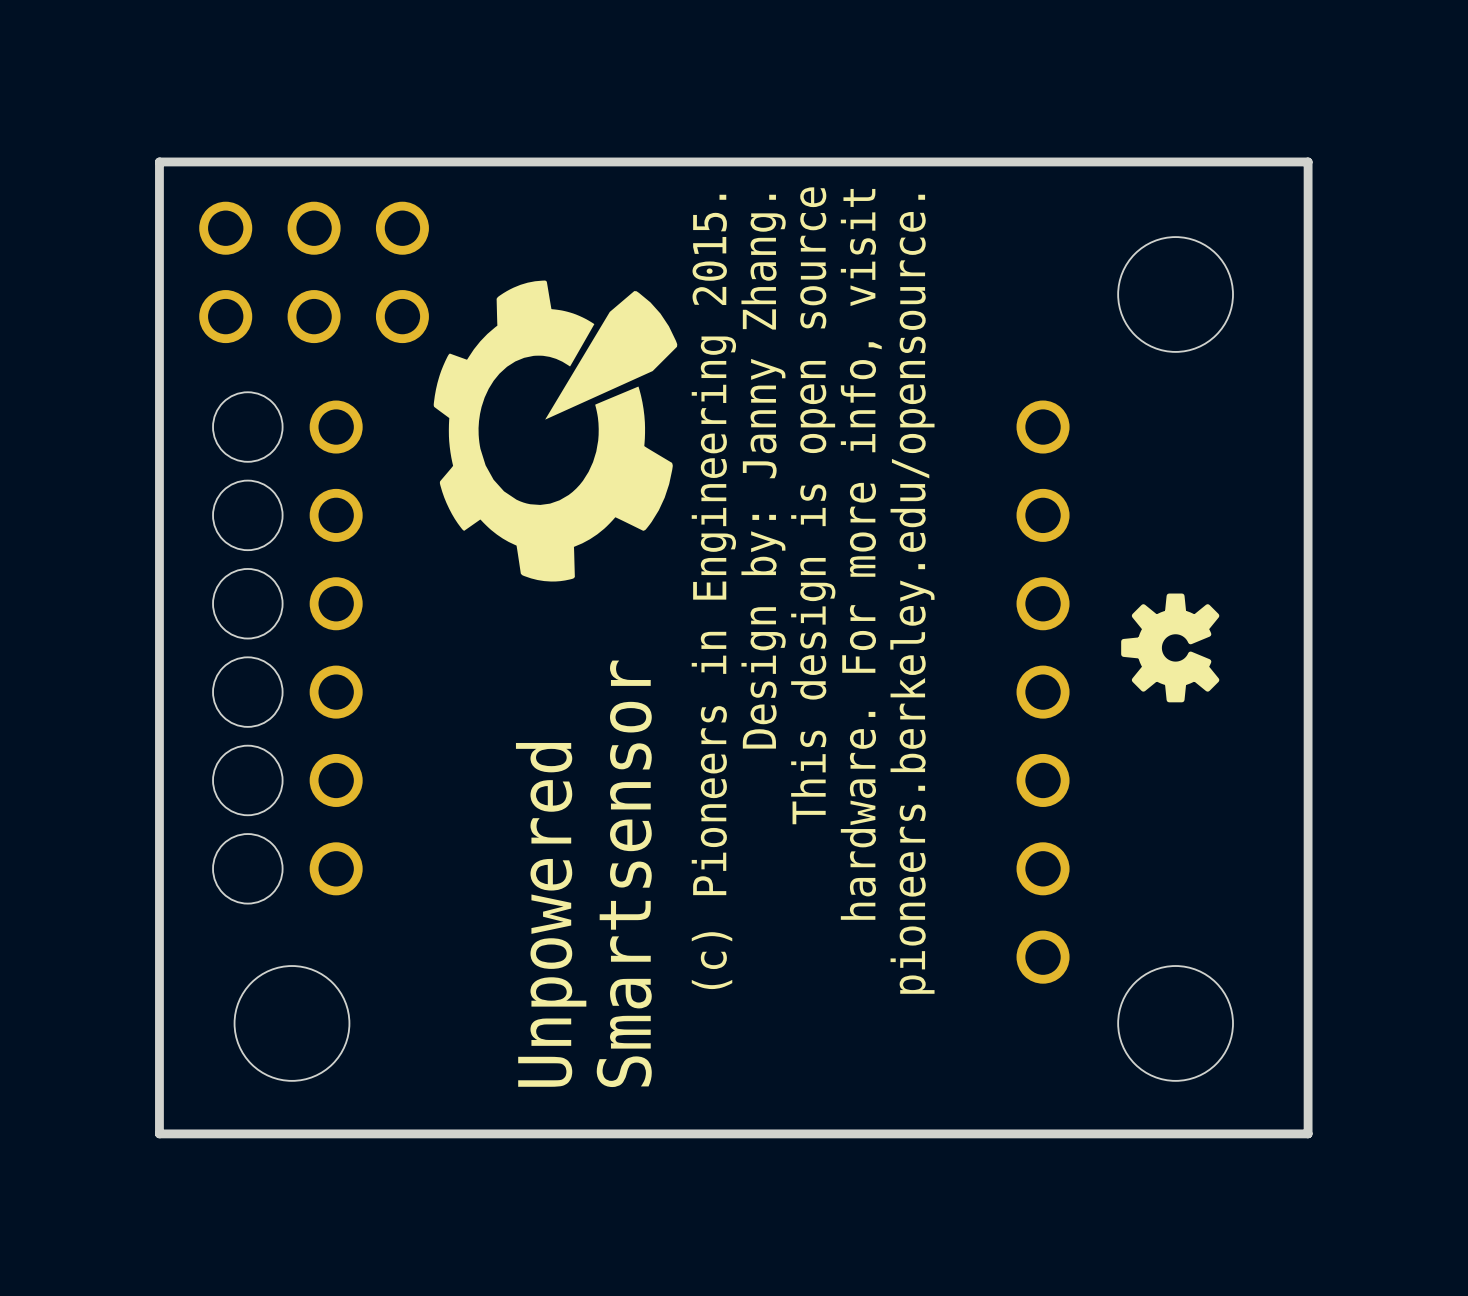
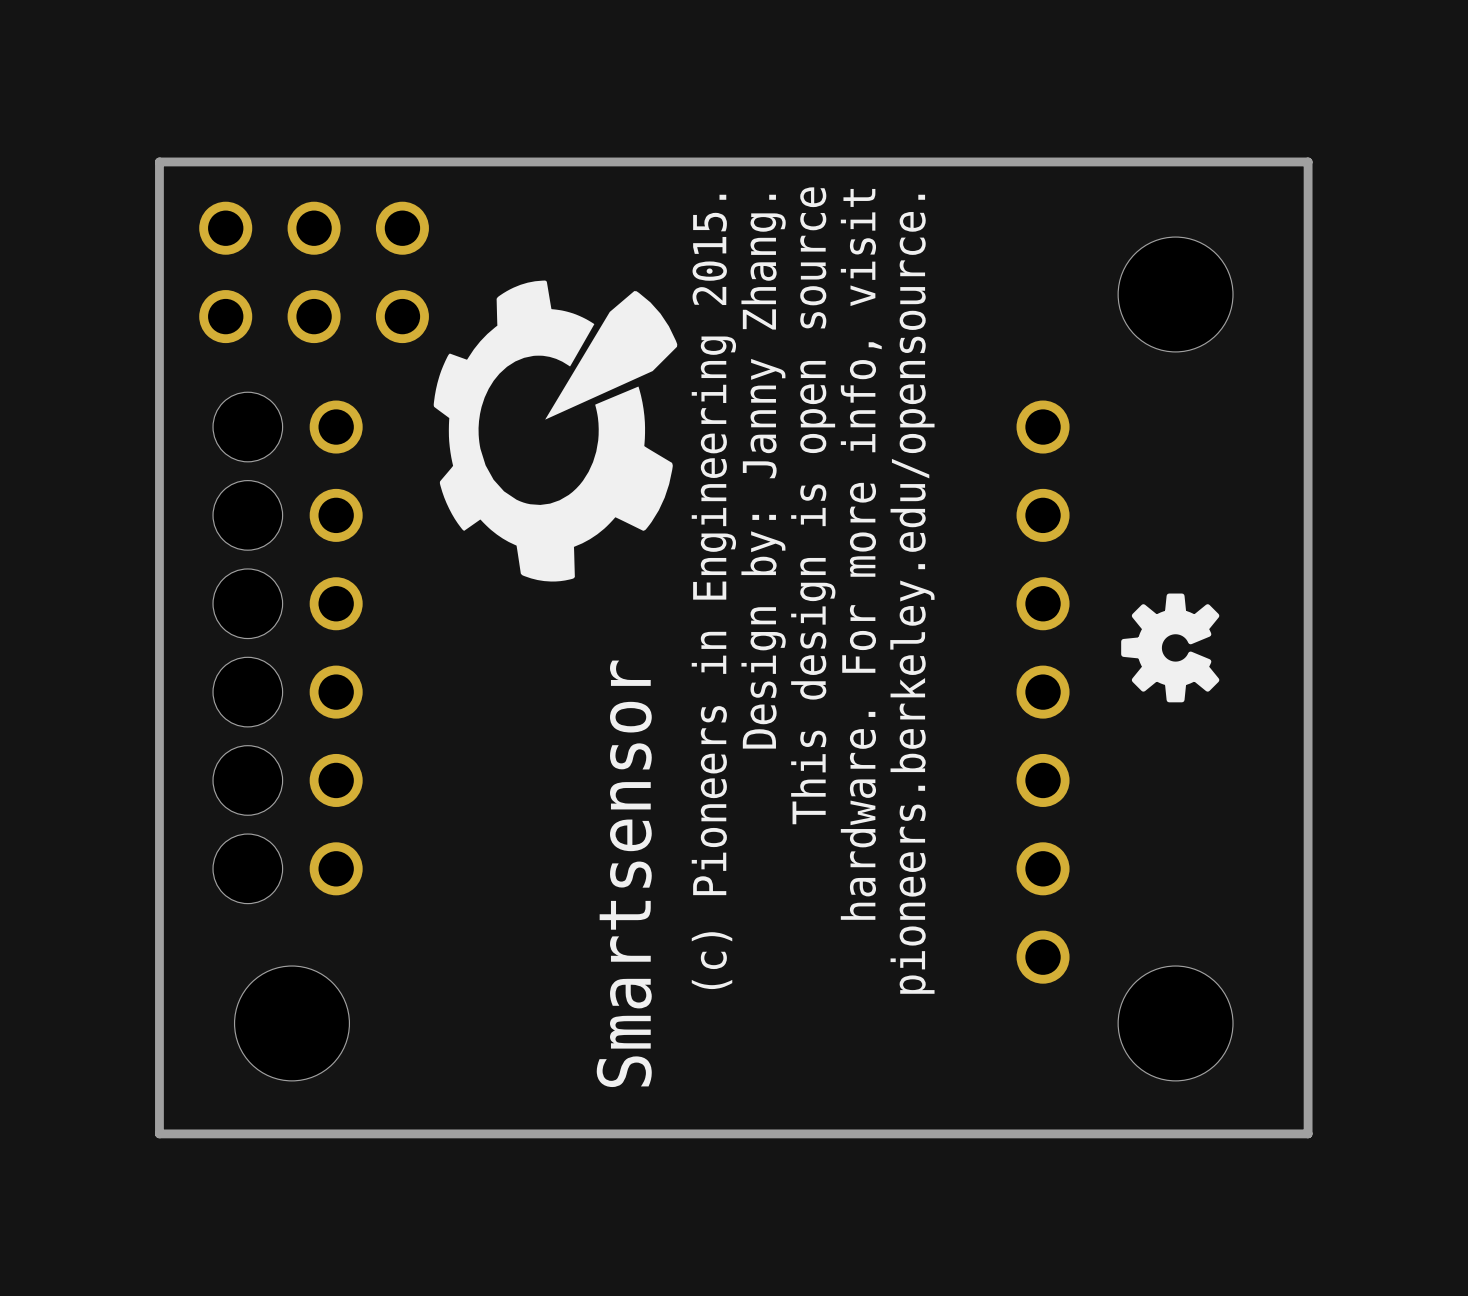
text: Unpowered (551, 914) -> none

